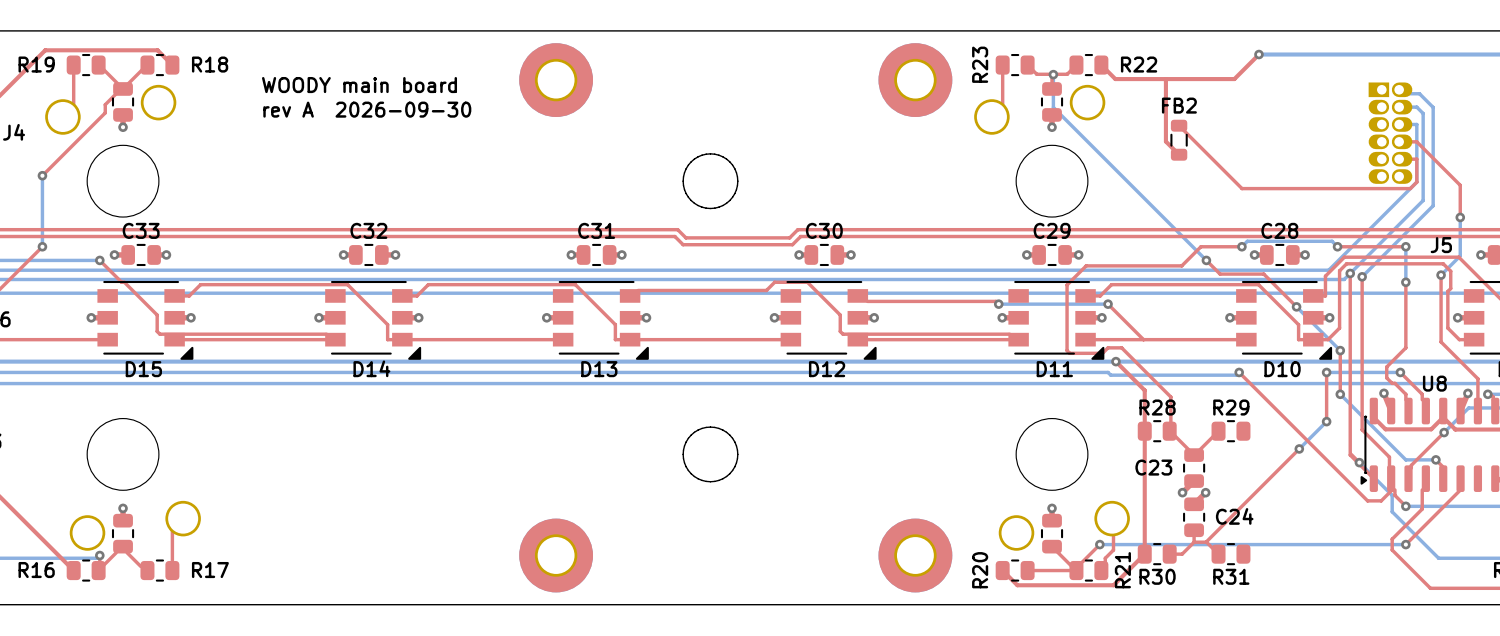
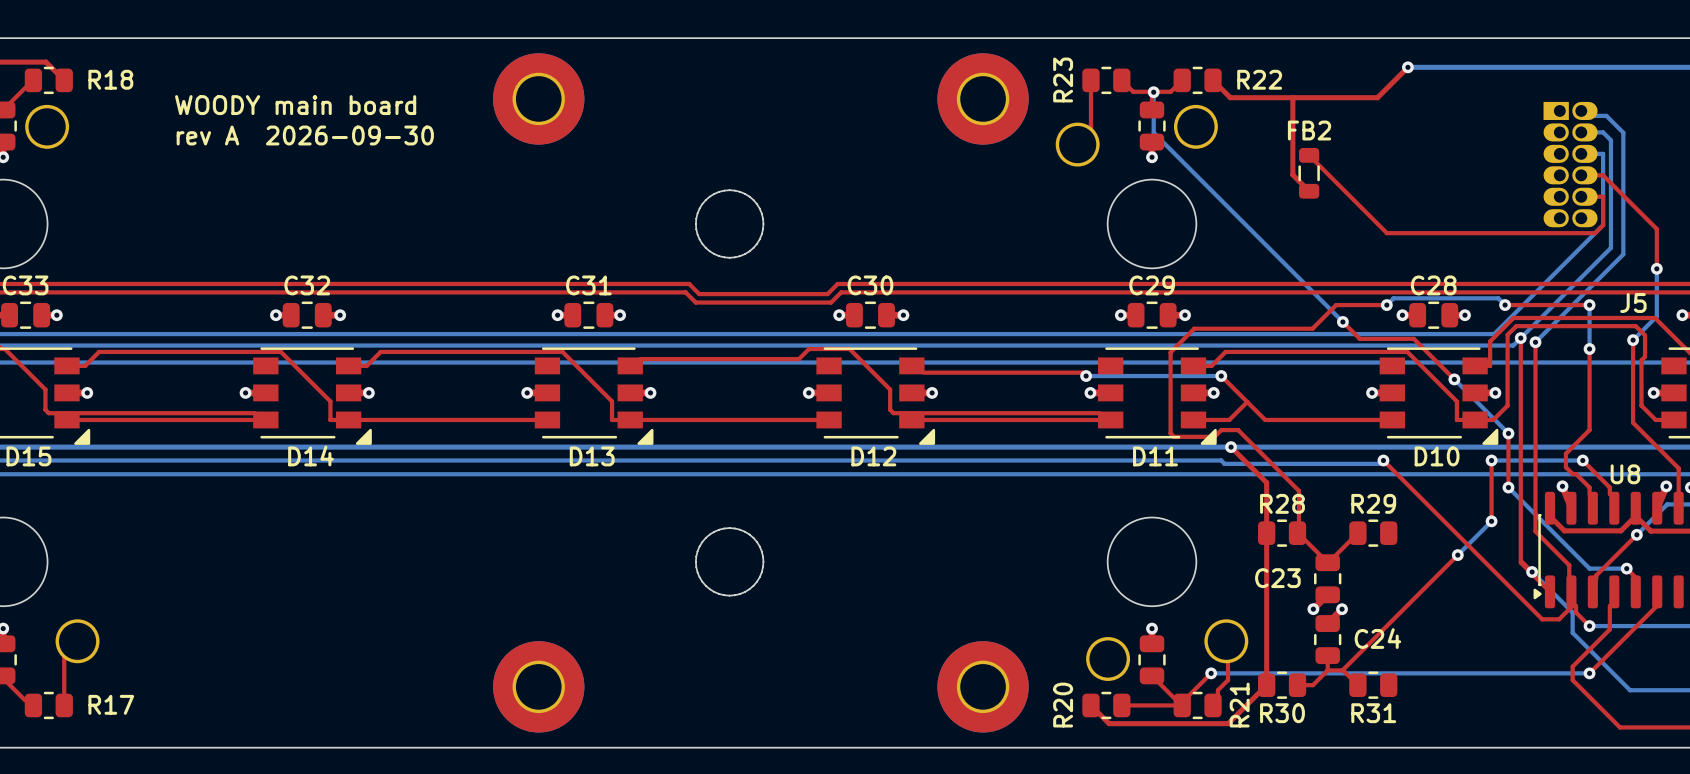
top track: (1114, 339) (1143, 339) -> (1229, 419) (1247, 402)

